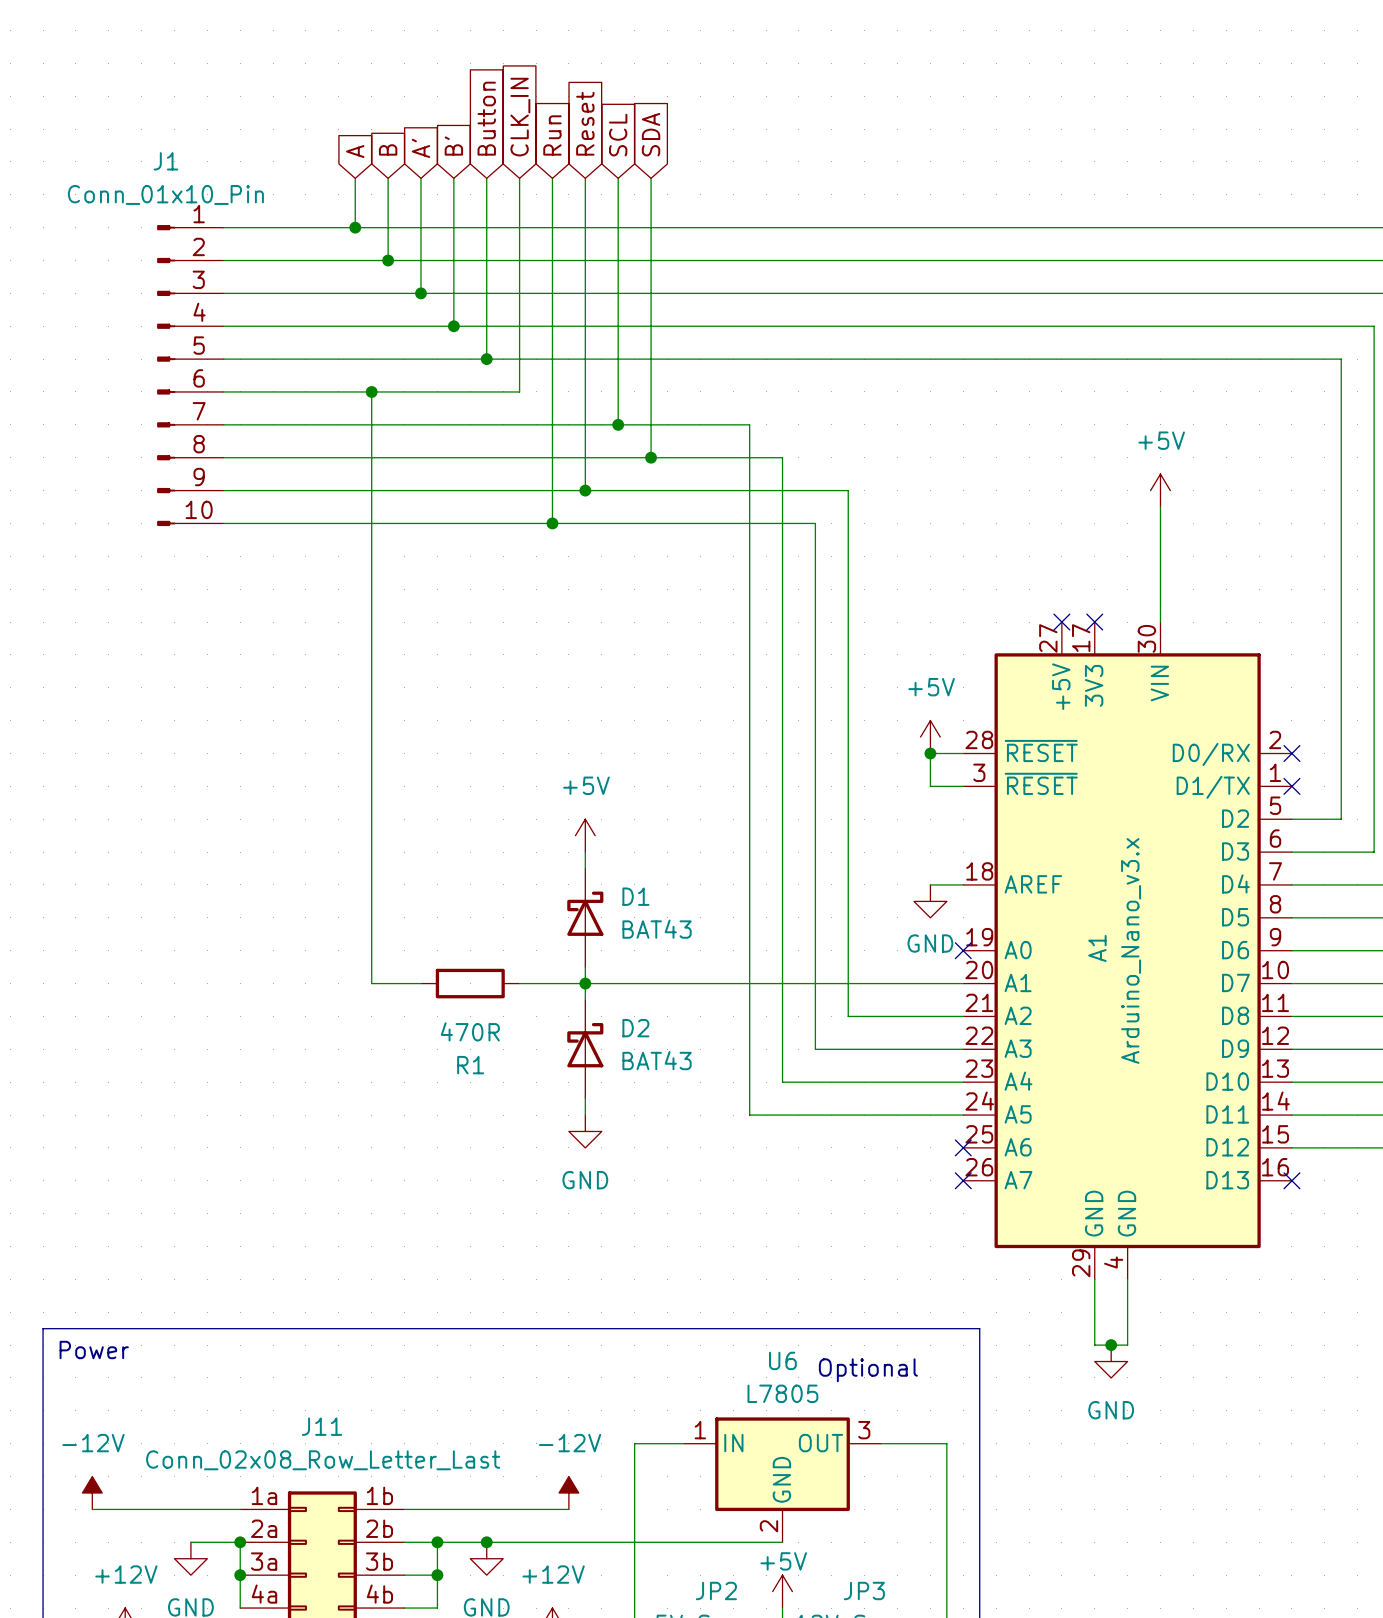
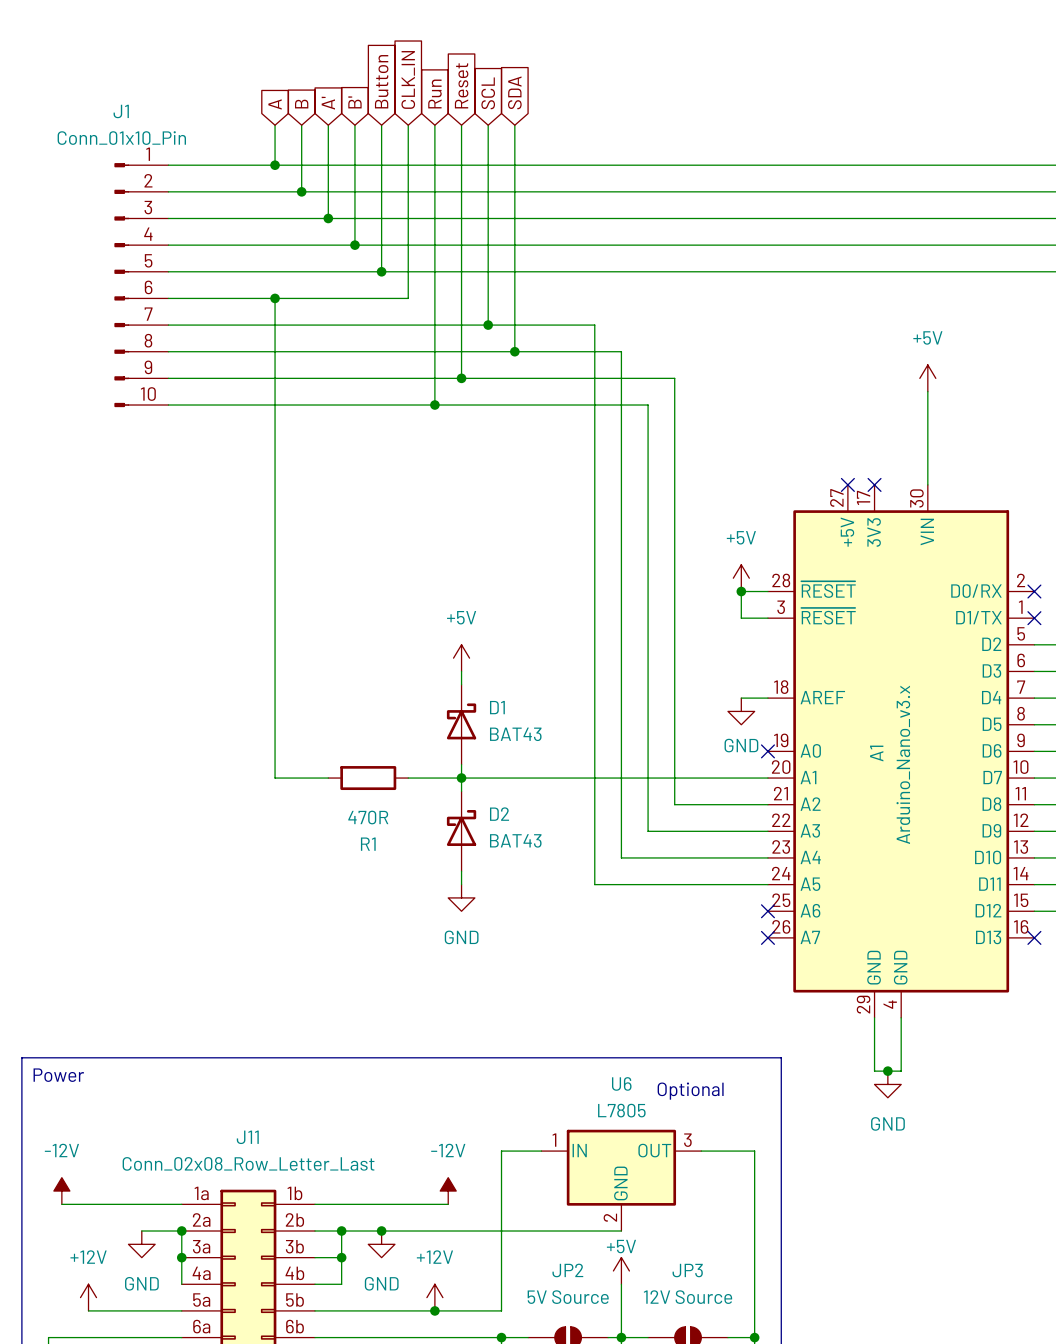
wire: (371, 391) (371, 983) -> (275, 298) (275, 778) (288, 778)
junction position: (371, 391) -> (275, 298)

